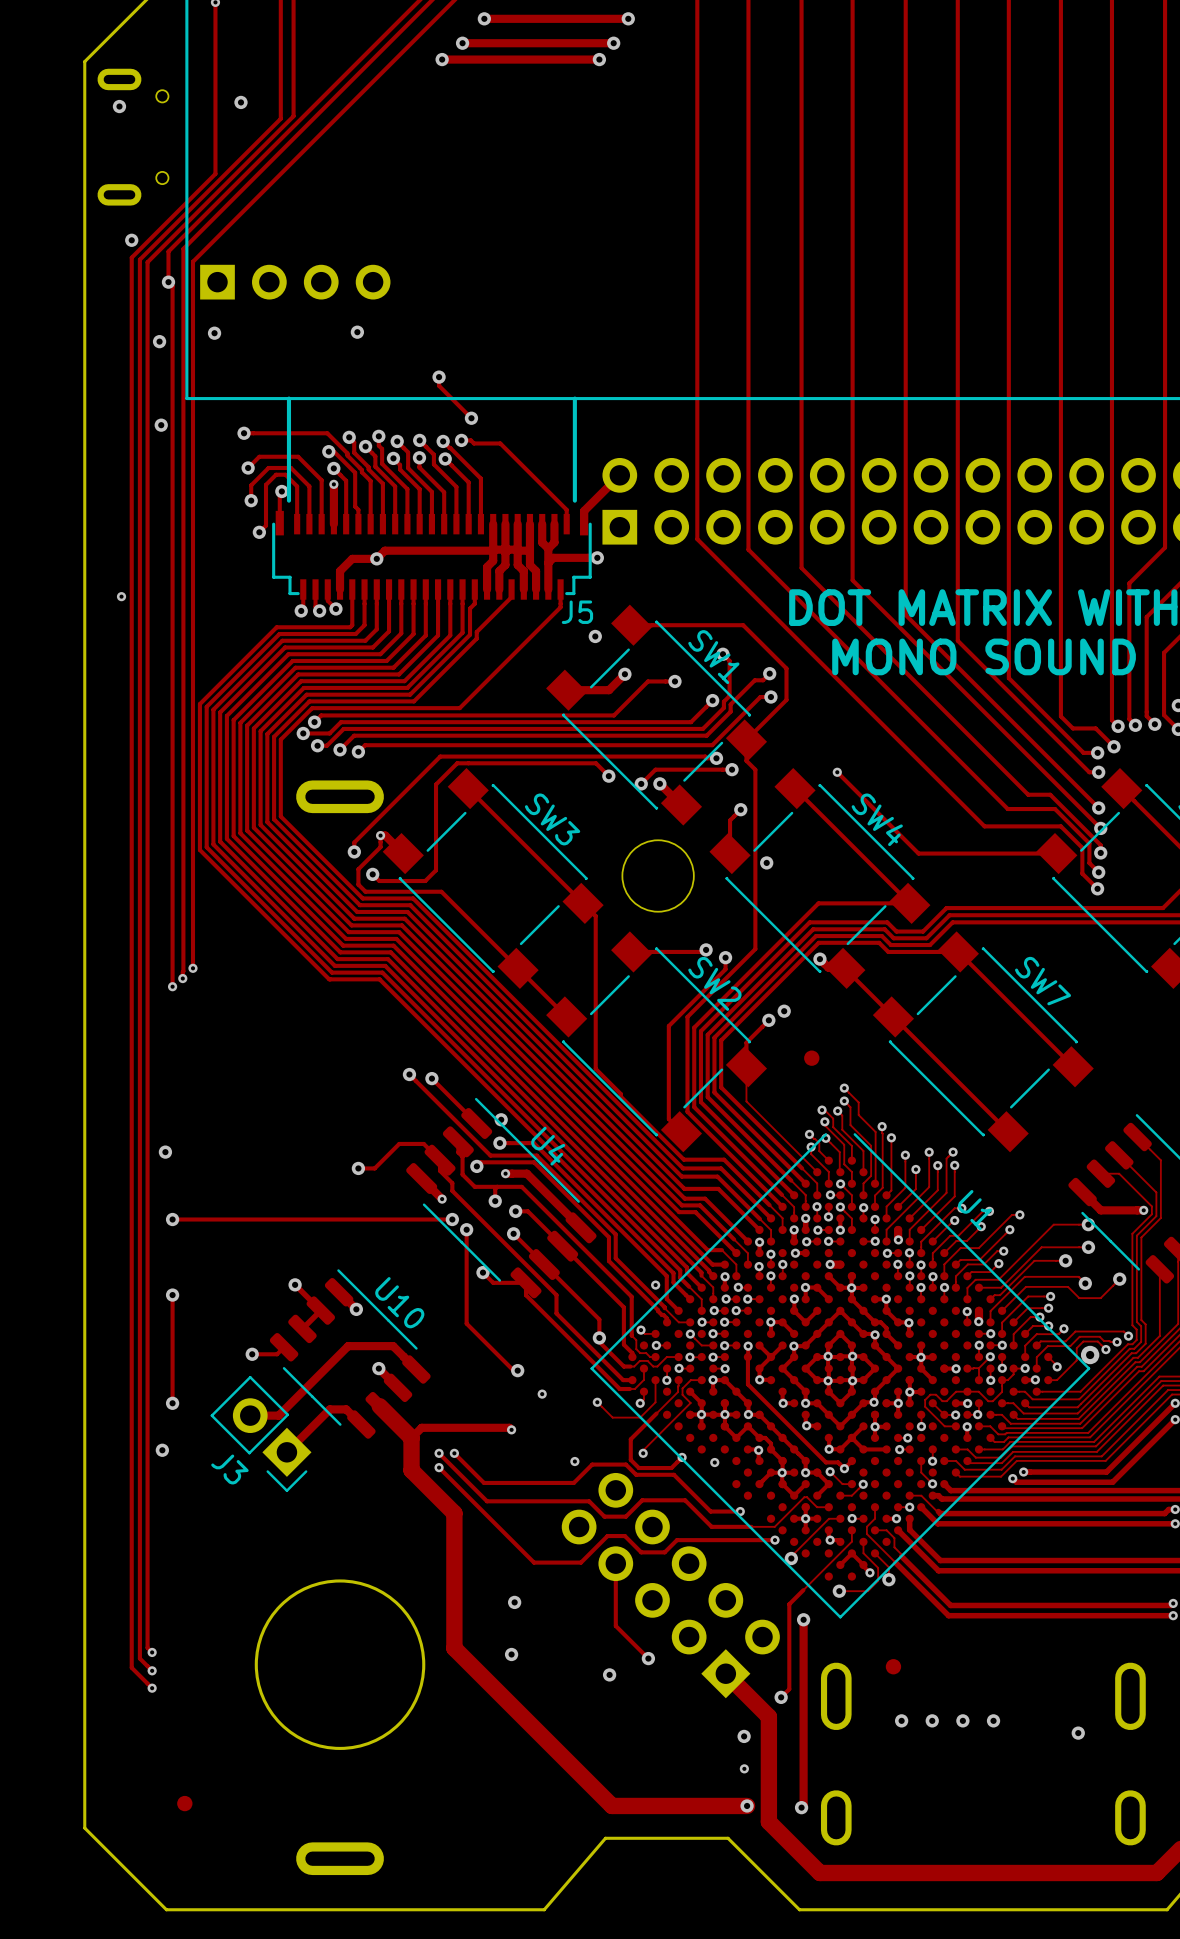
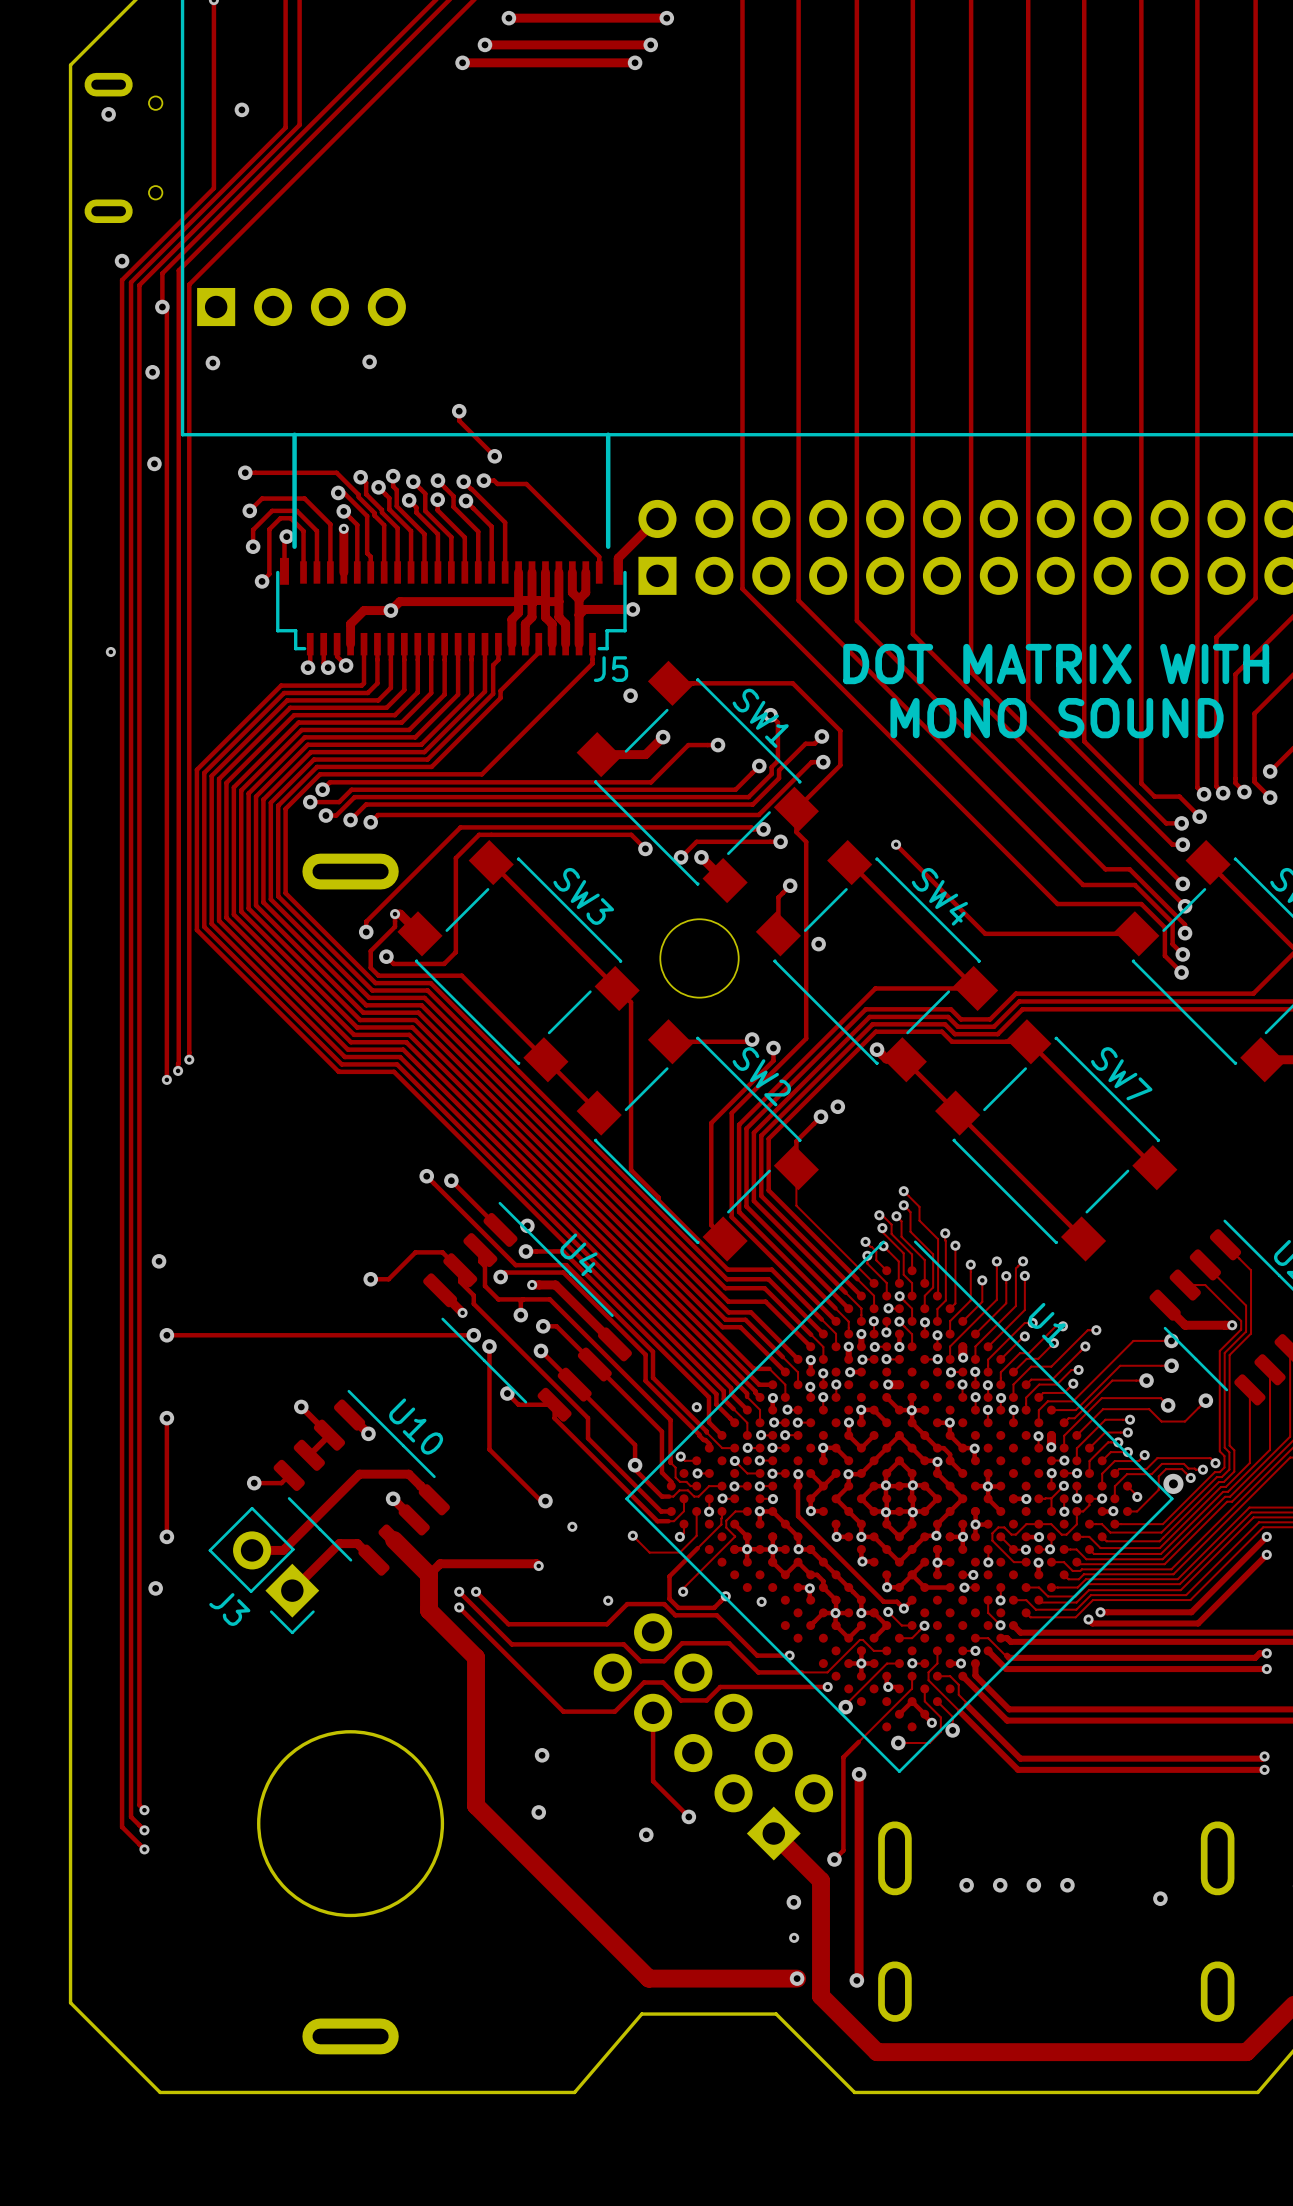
part: (811, 1058) -> none
part: (893, 1666) -> none
part: (184, 1803) -> none

